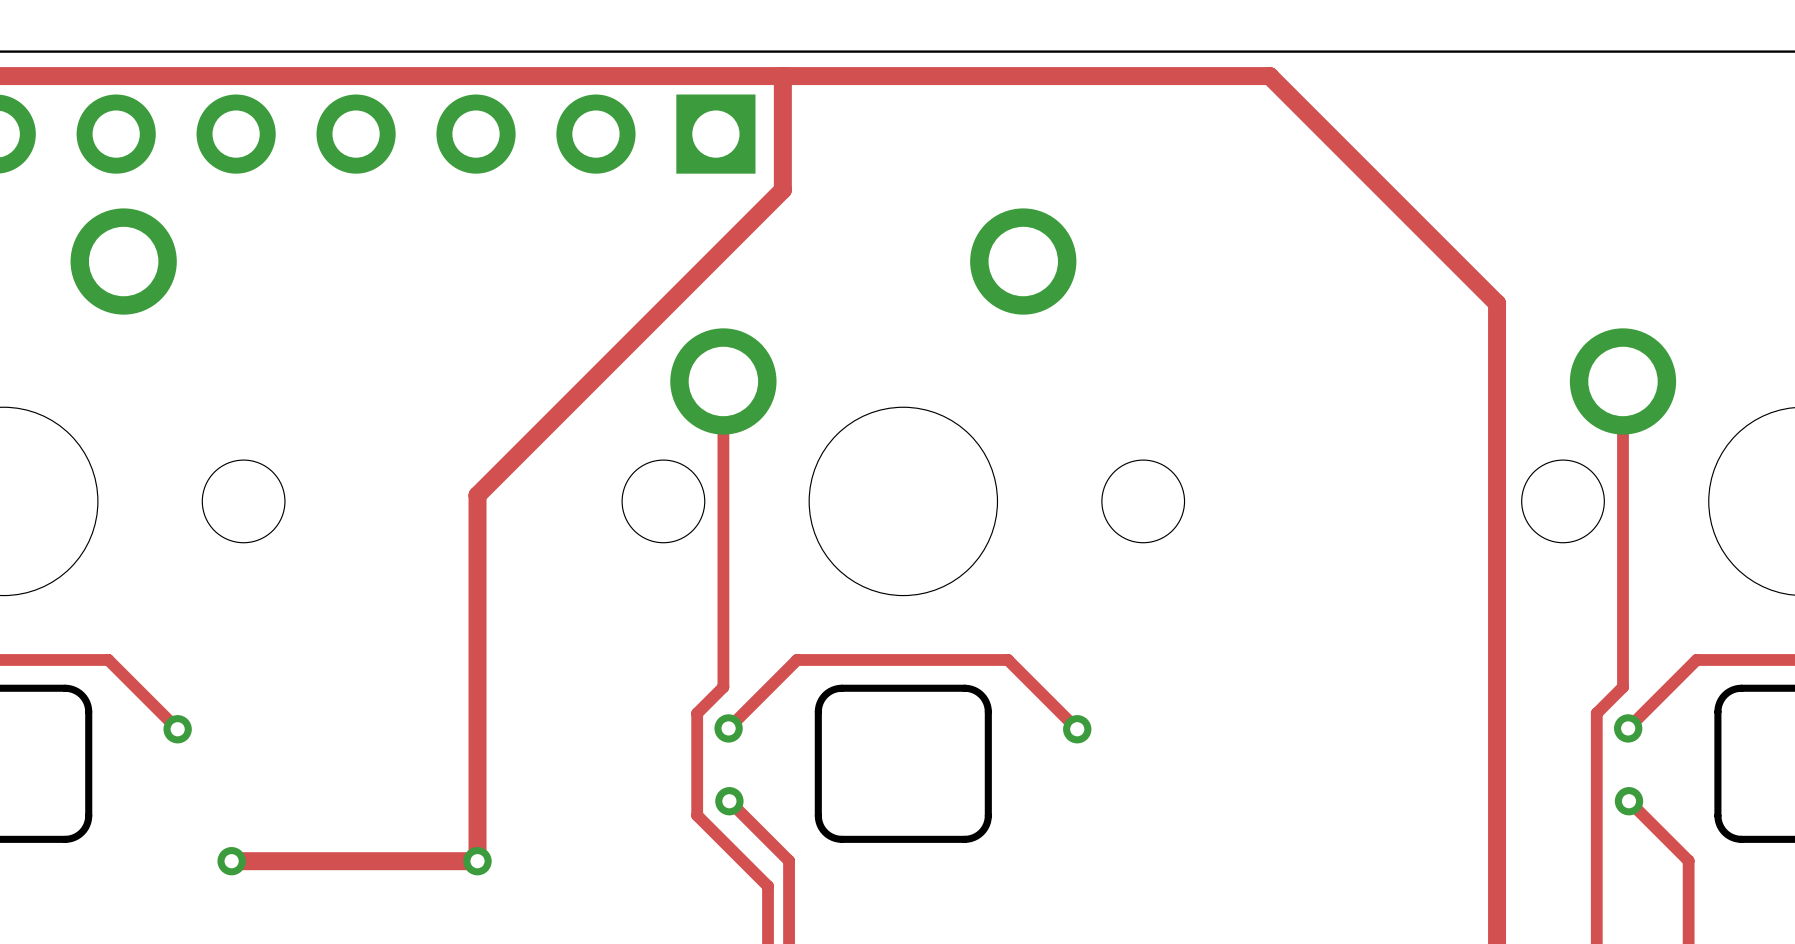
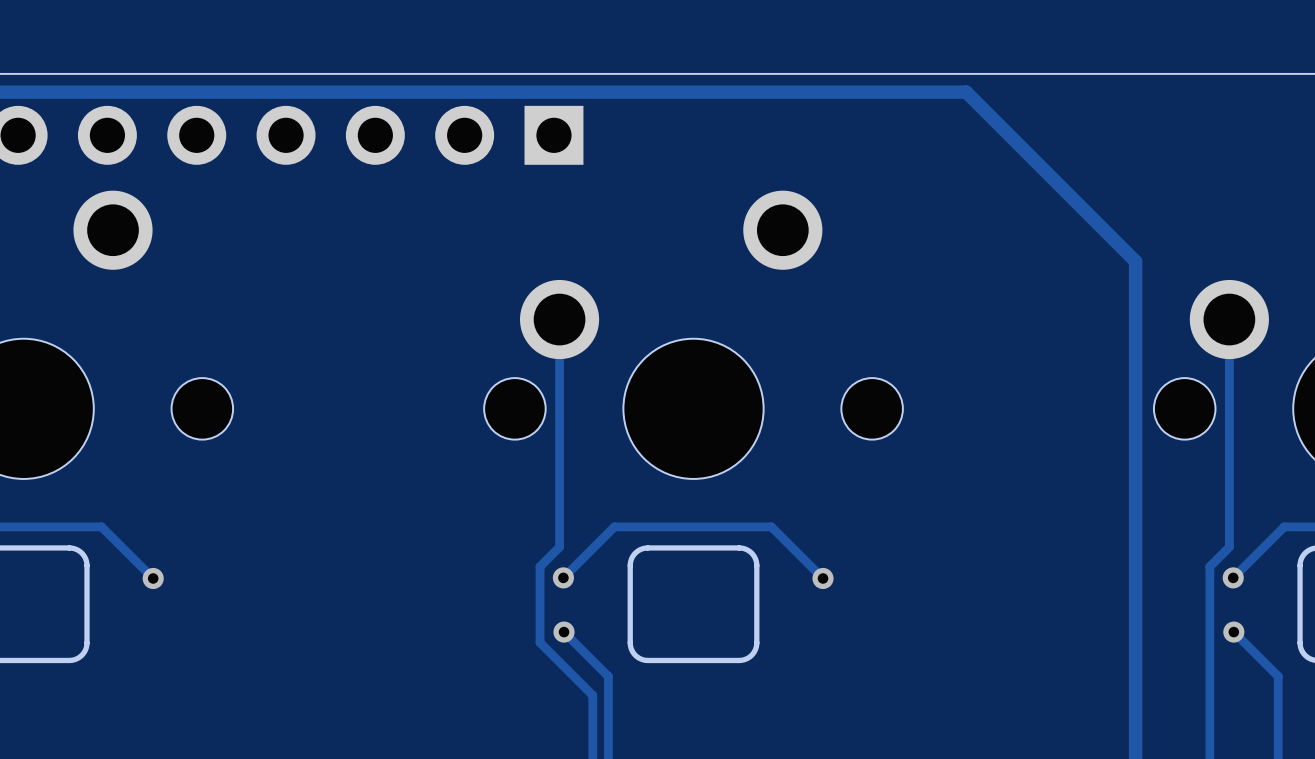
track: (782, 76) (782, 190) (477, 495) (477, 861) (231, 861) -> none
via: (231, 861) -> none
via: (477, 861) -> none

